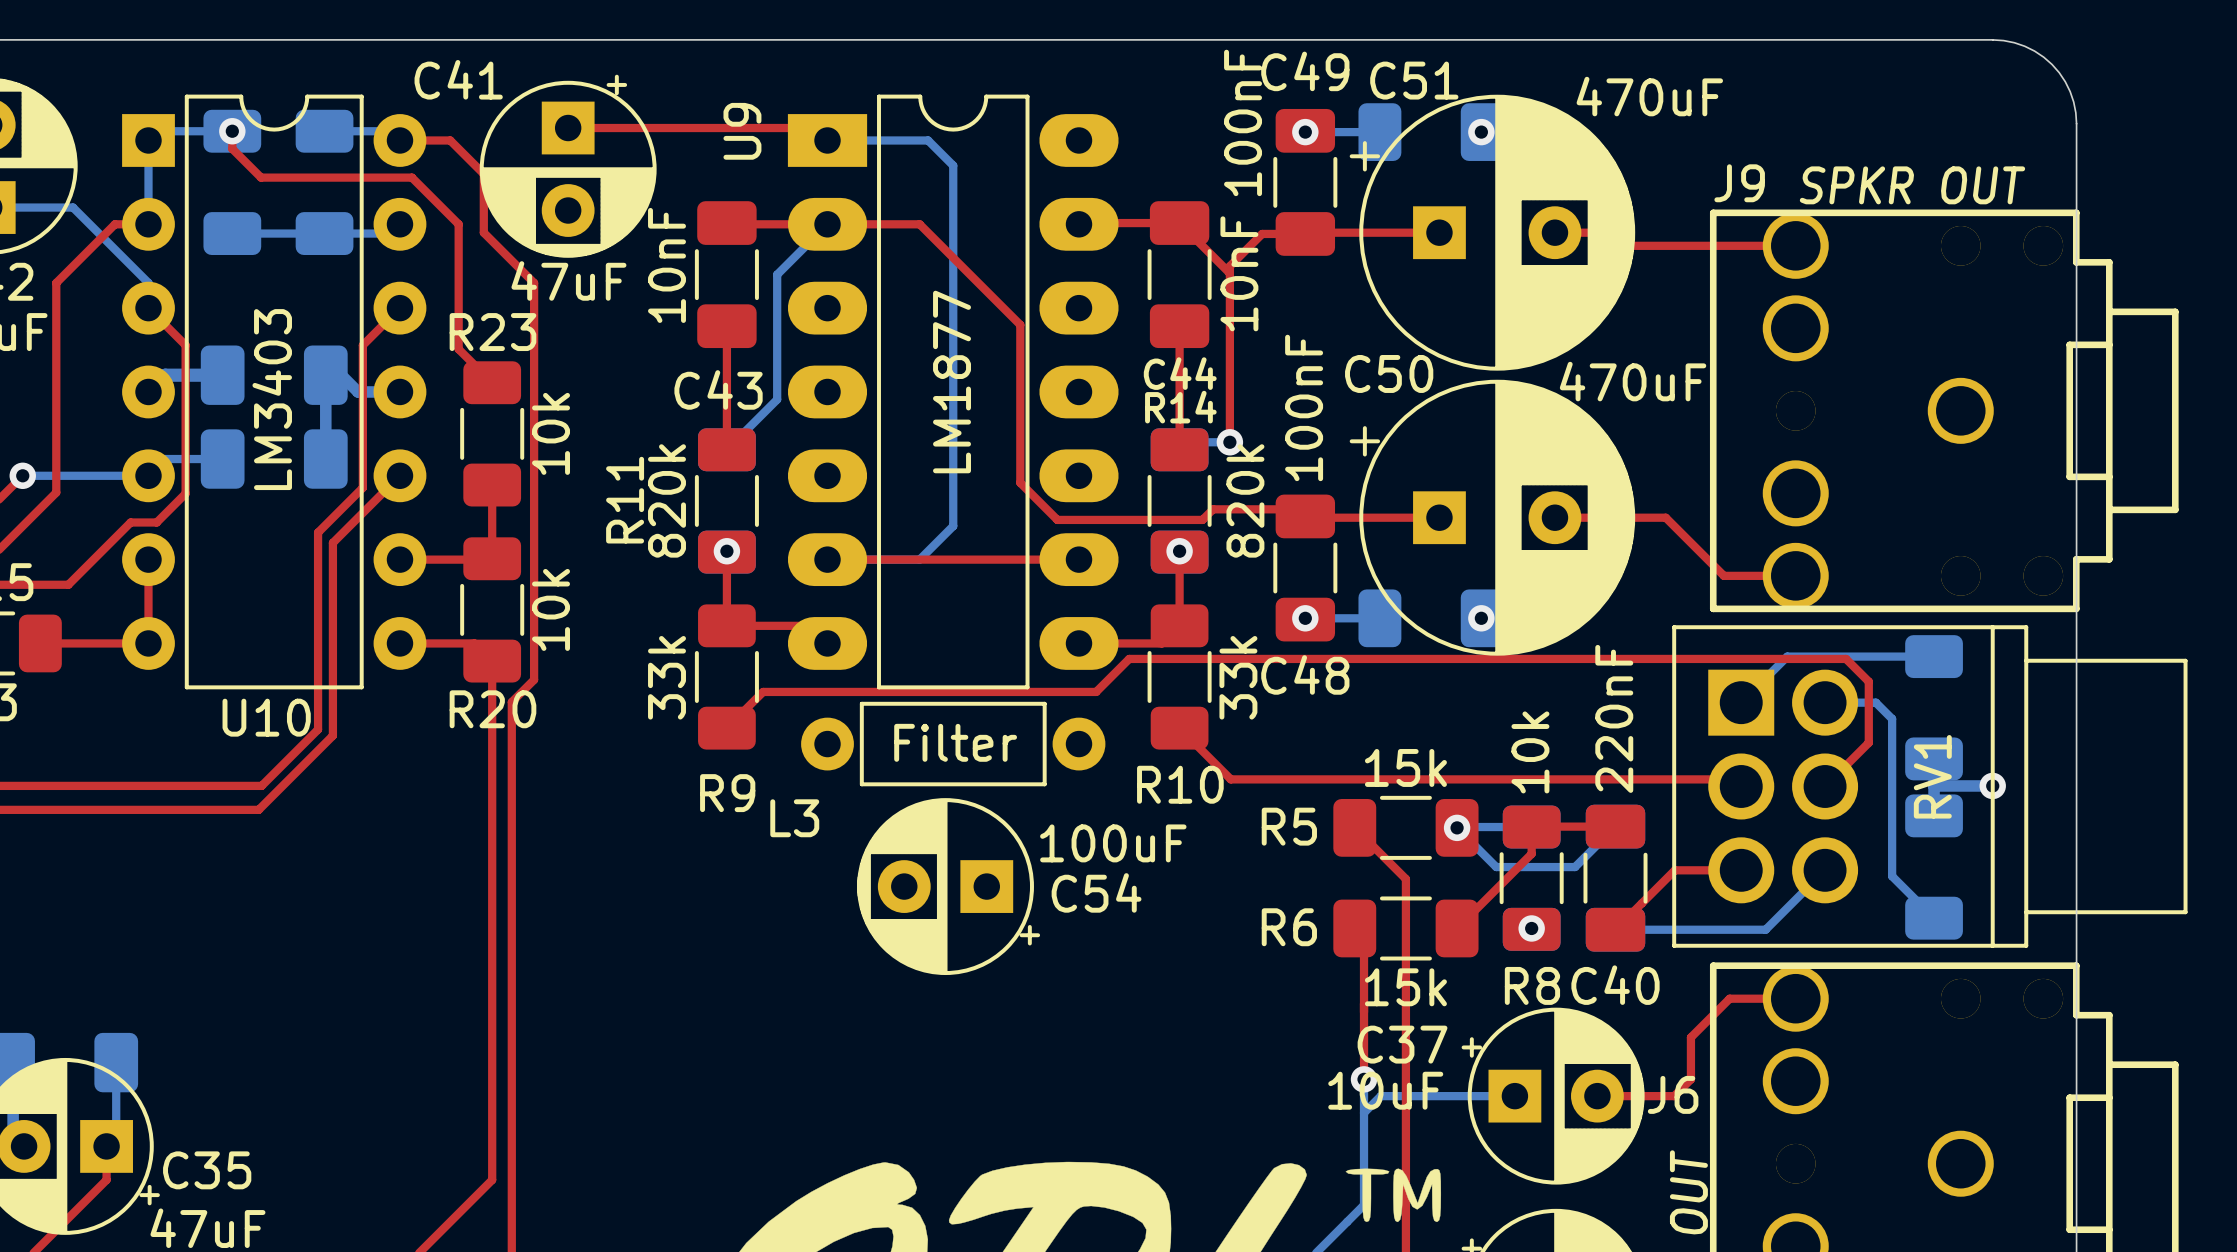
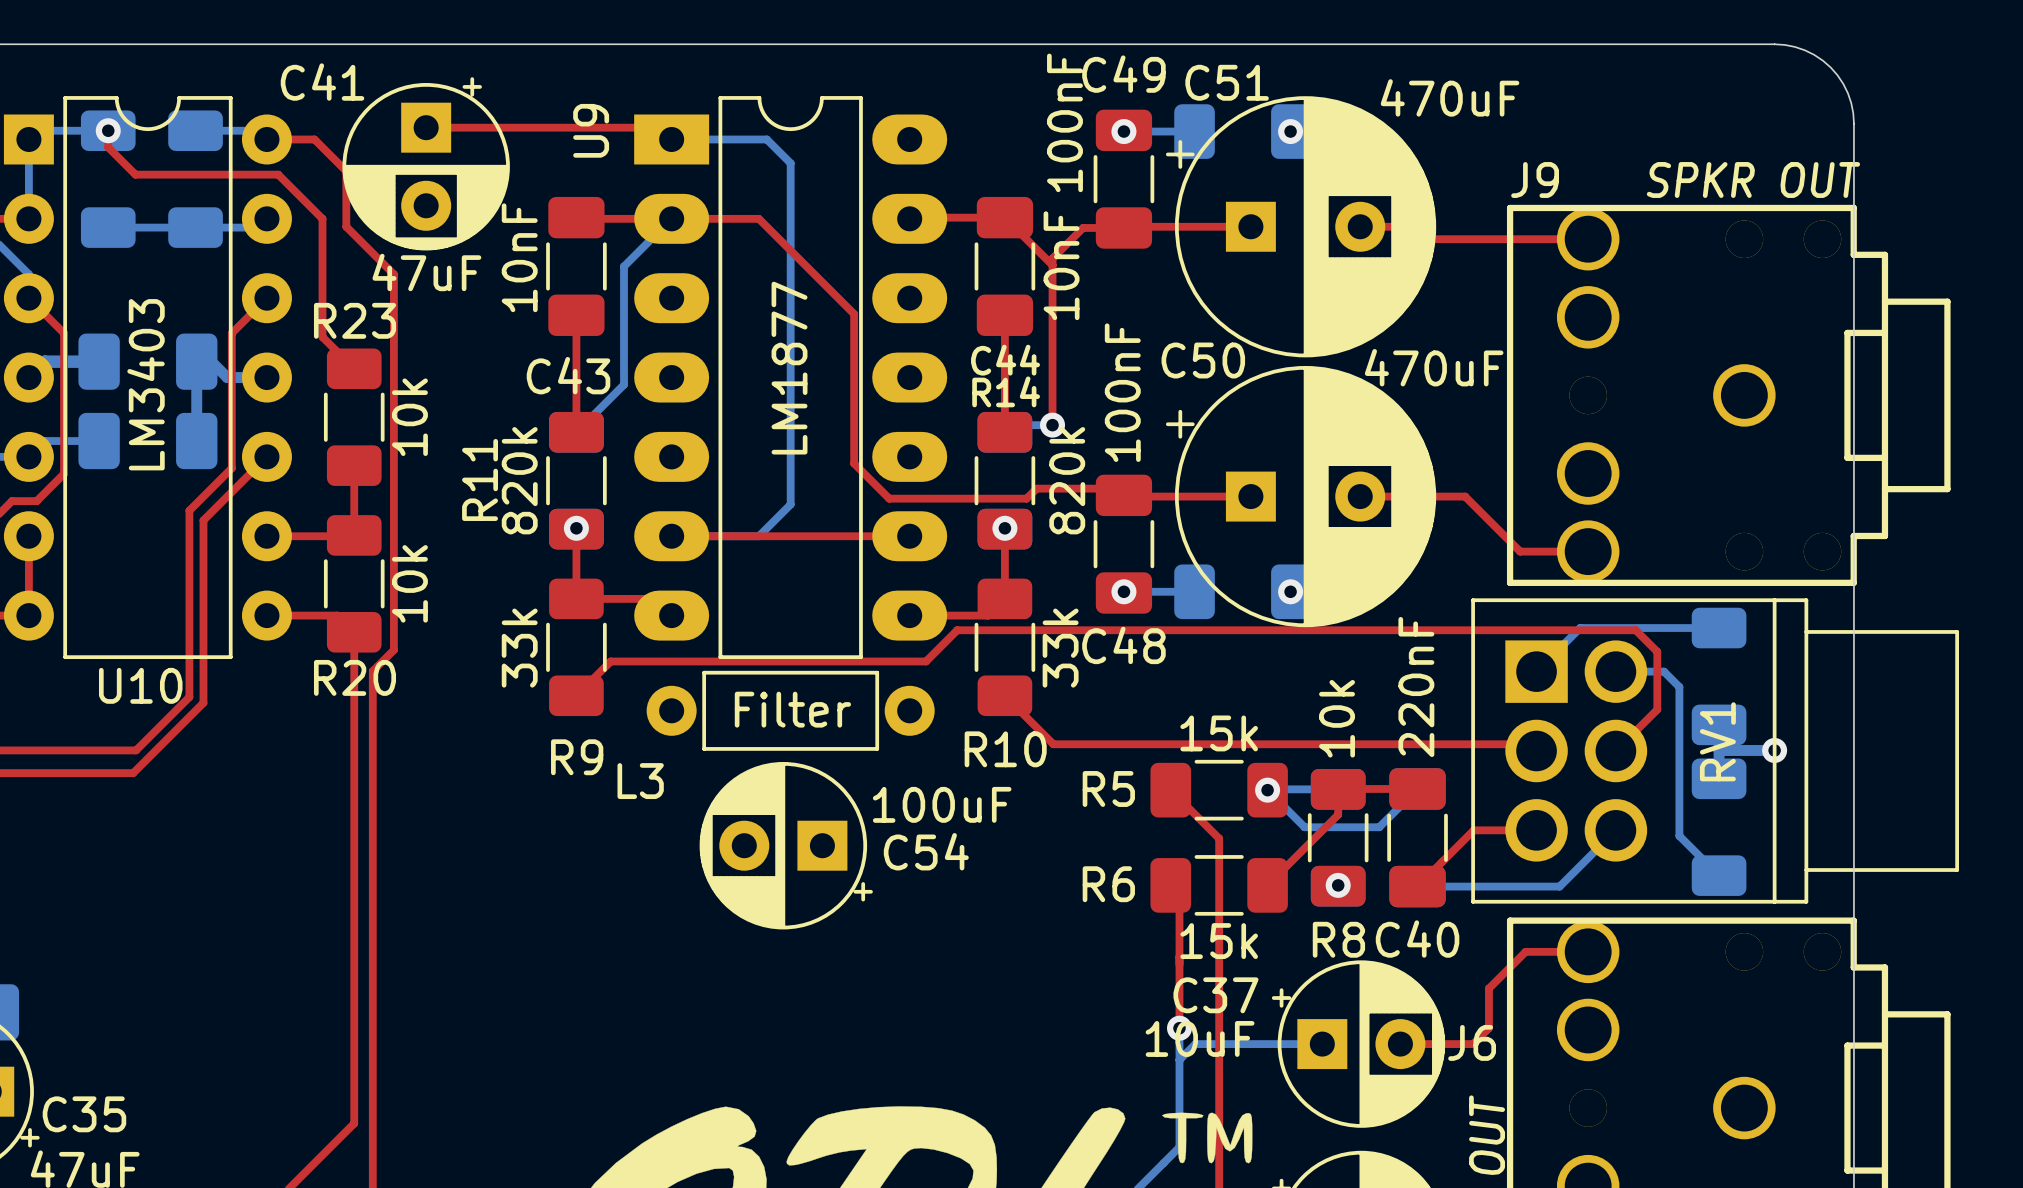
J9 value position: SPKR OUT (1912, 185) -> SPKR OUT (1753, 180)

